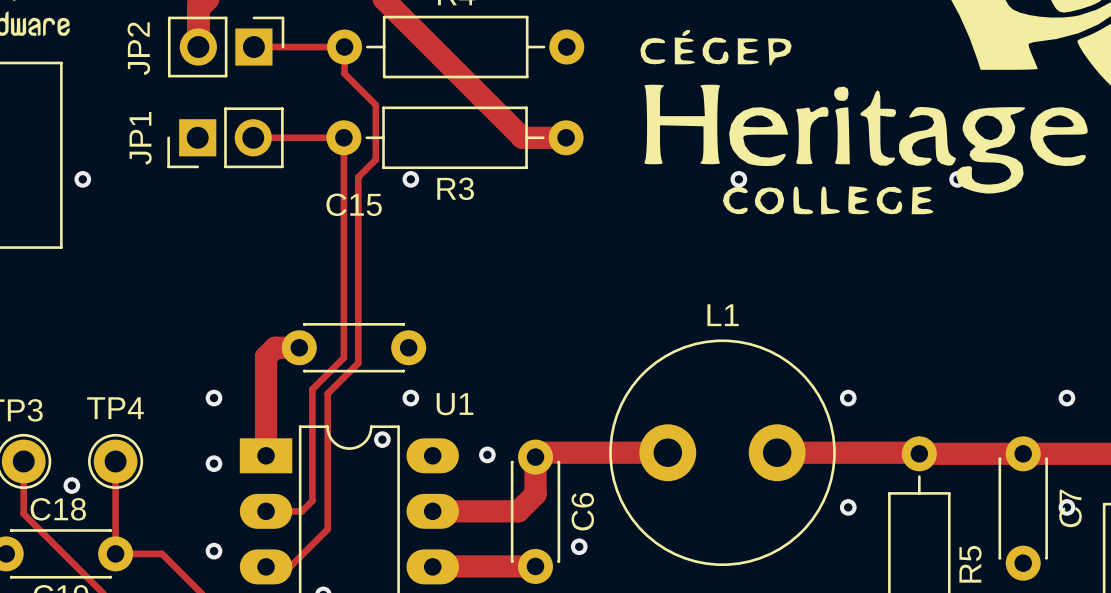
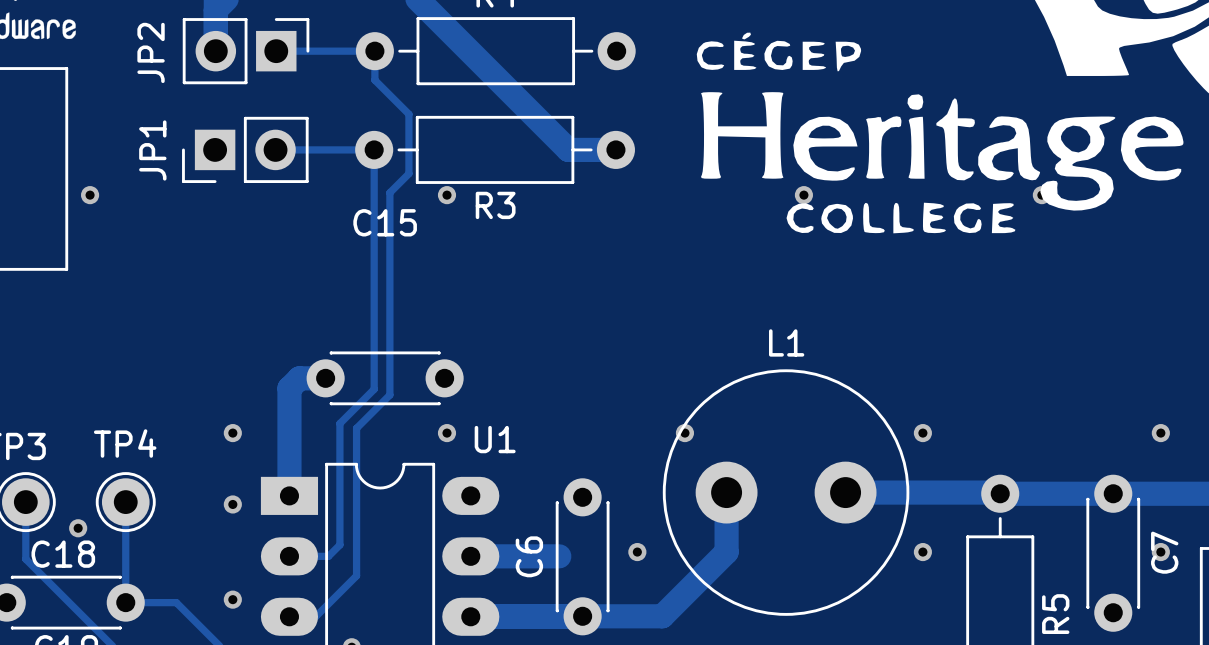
via: none -> (684, 433)
via: (382, 439) -> none
track: (667, 452) (539, 452) (535, 457) (535, 494) (518, 511) (514, 511) -> (726, 492) (726, 552) (662, 616) (470, 616)
via: (487, 454) -> none
via: none -> (637, 552)
C6 name position: C6 (582, 511) -> C6 (529, 556)
via: (579, 546) -> none

